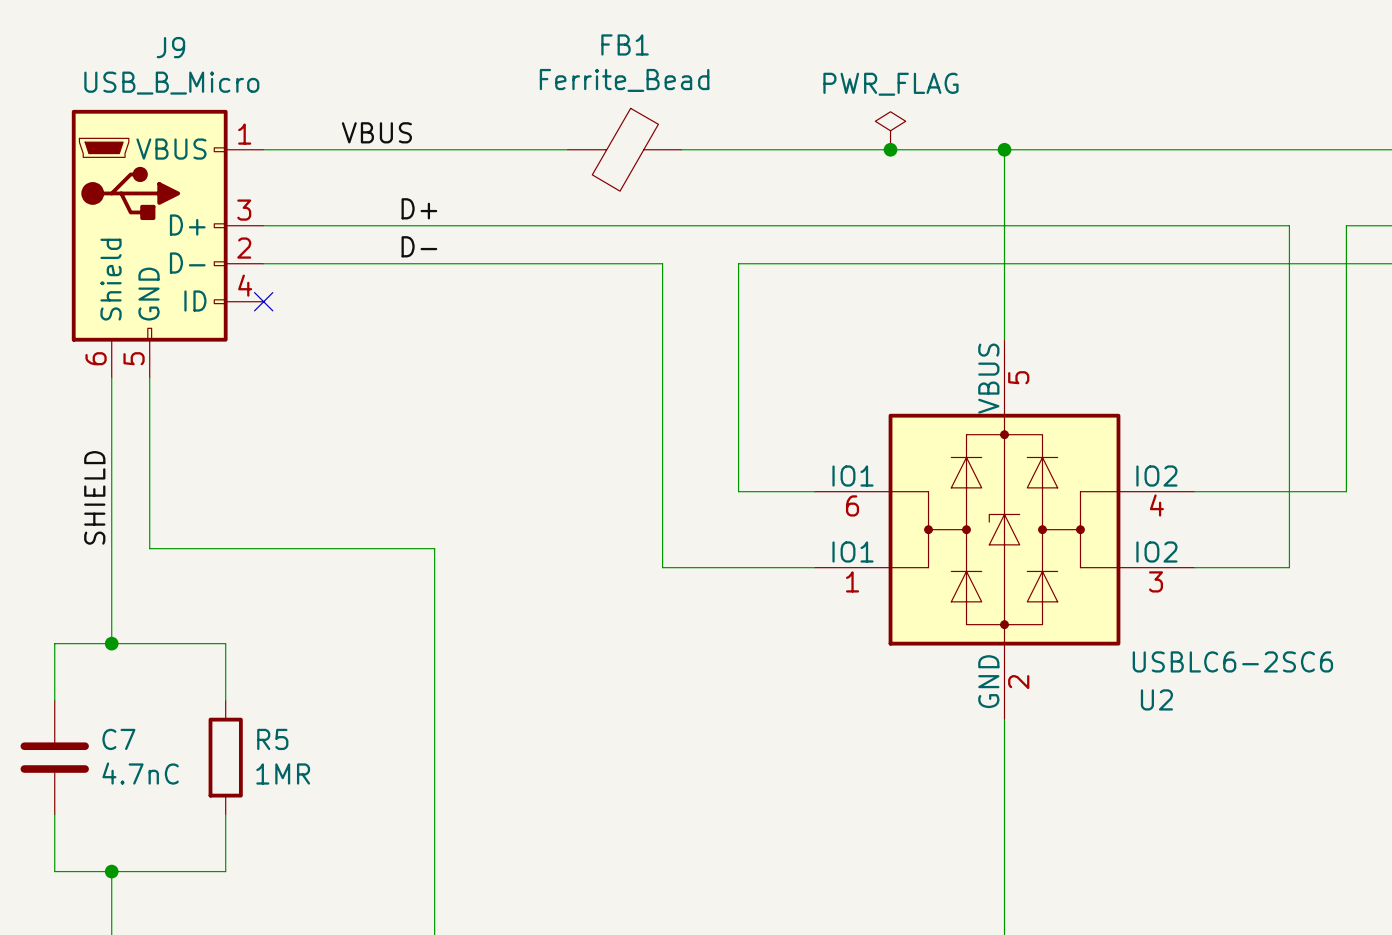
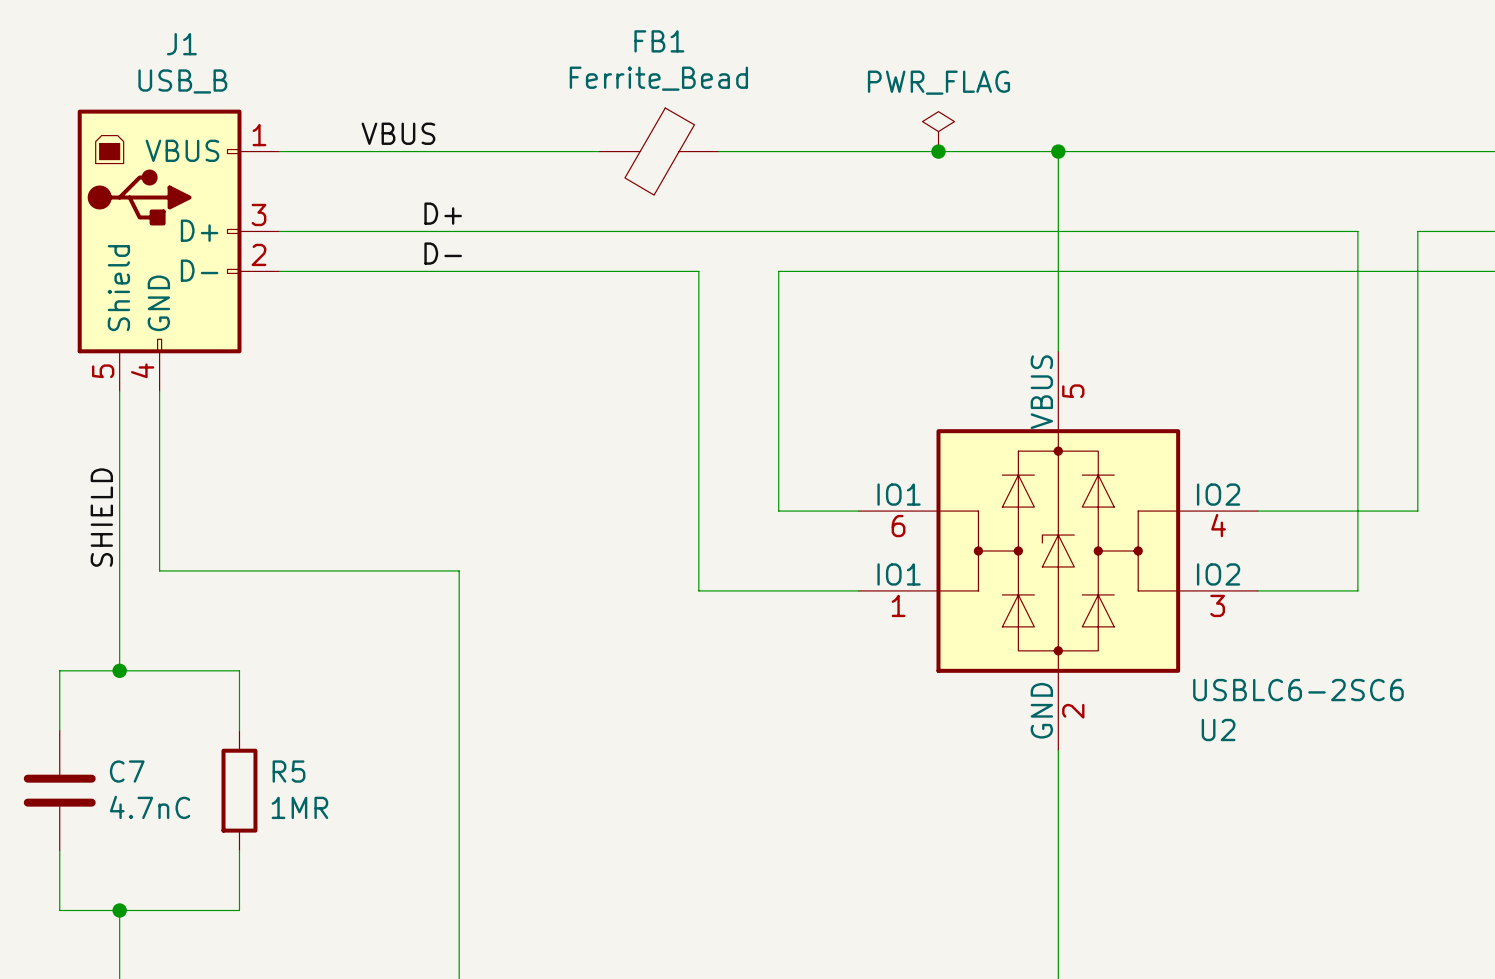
J9: USB_B_Micro (167, 243) -> none
J1: none -> USB_B (178, 250)
no-connect mark: (263, 301) -> none

